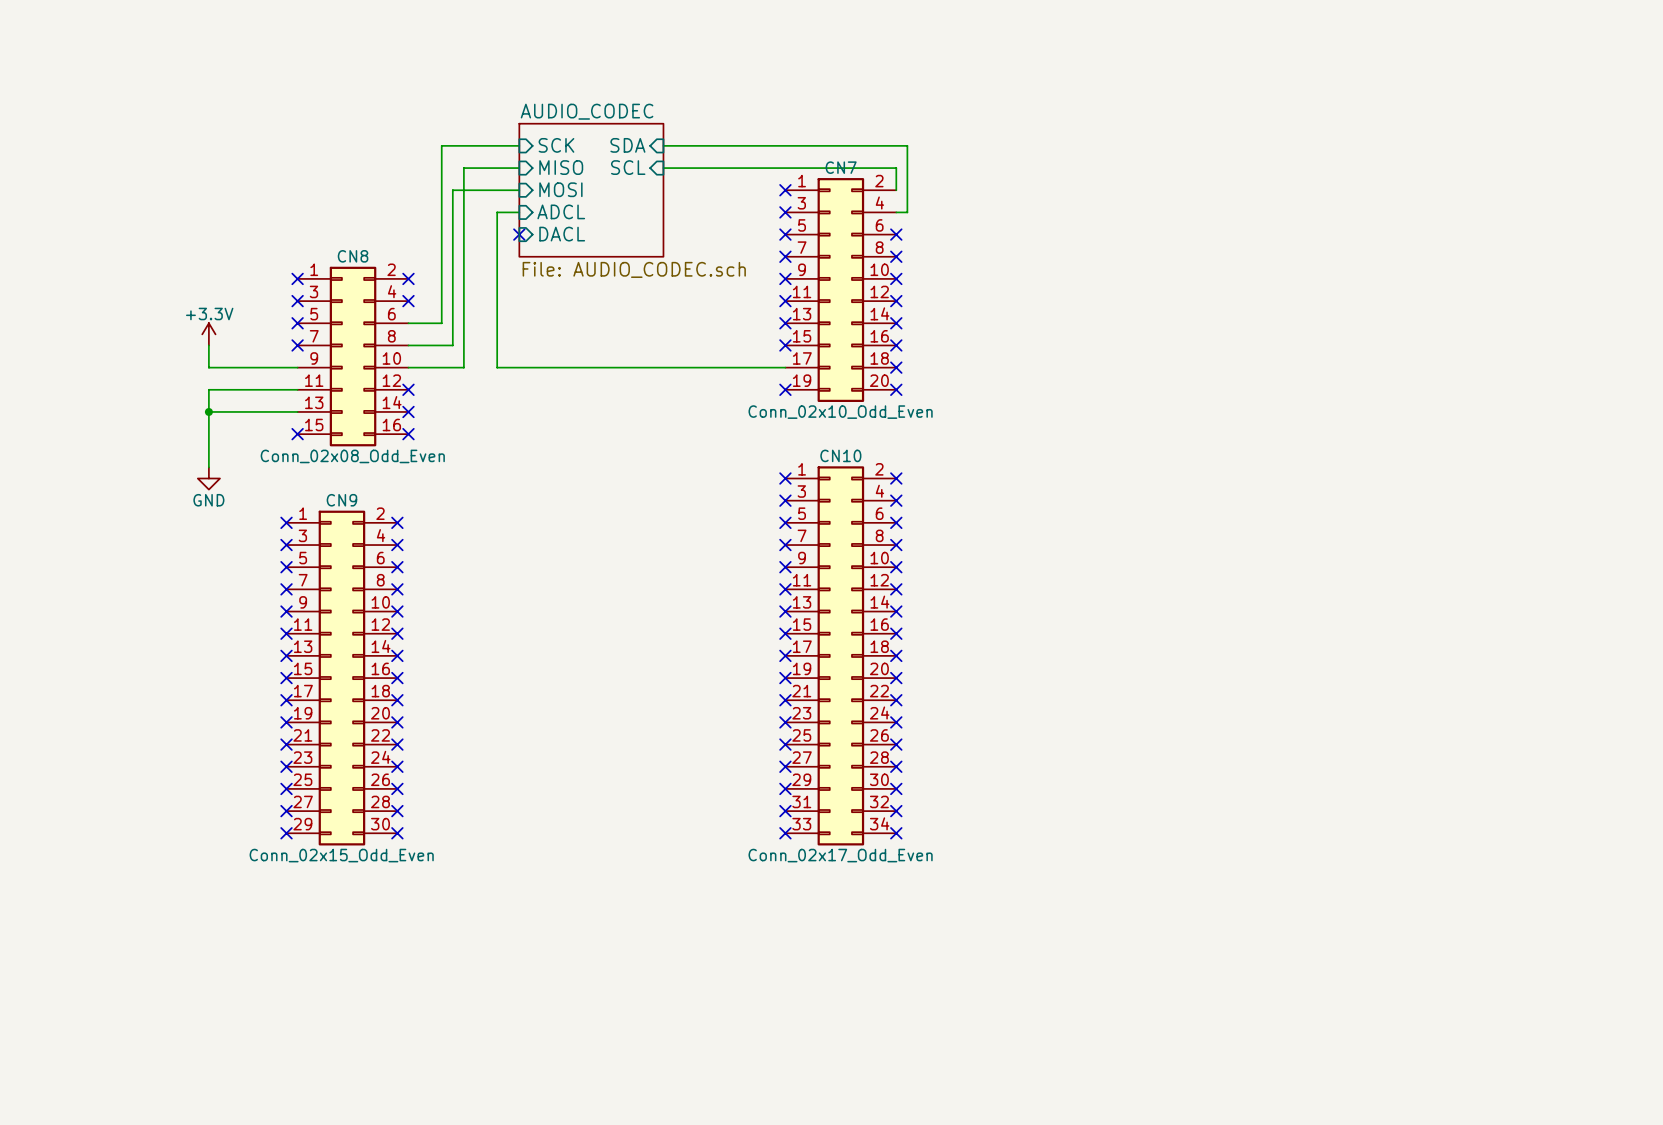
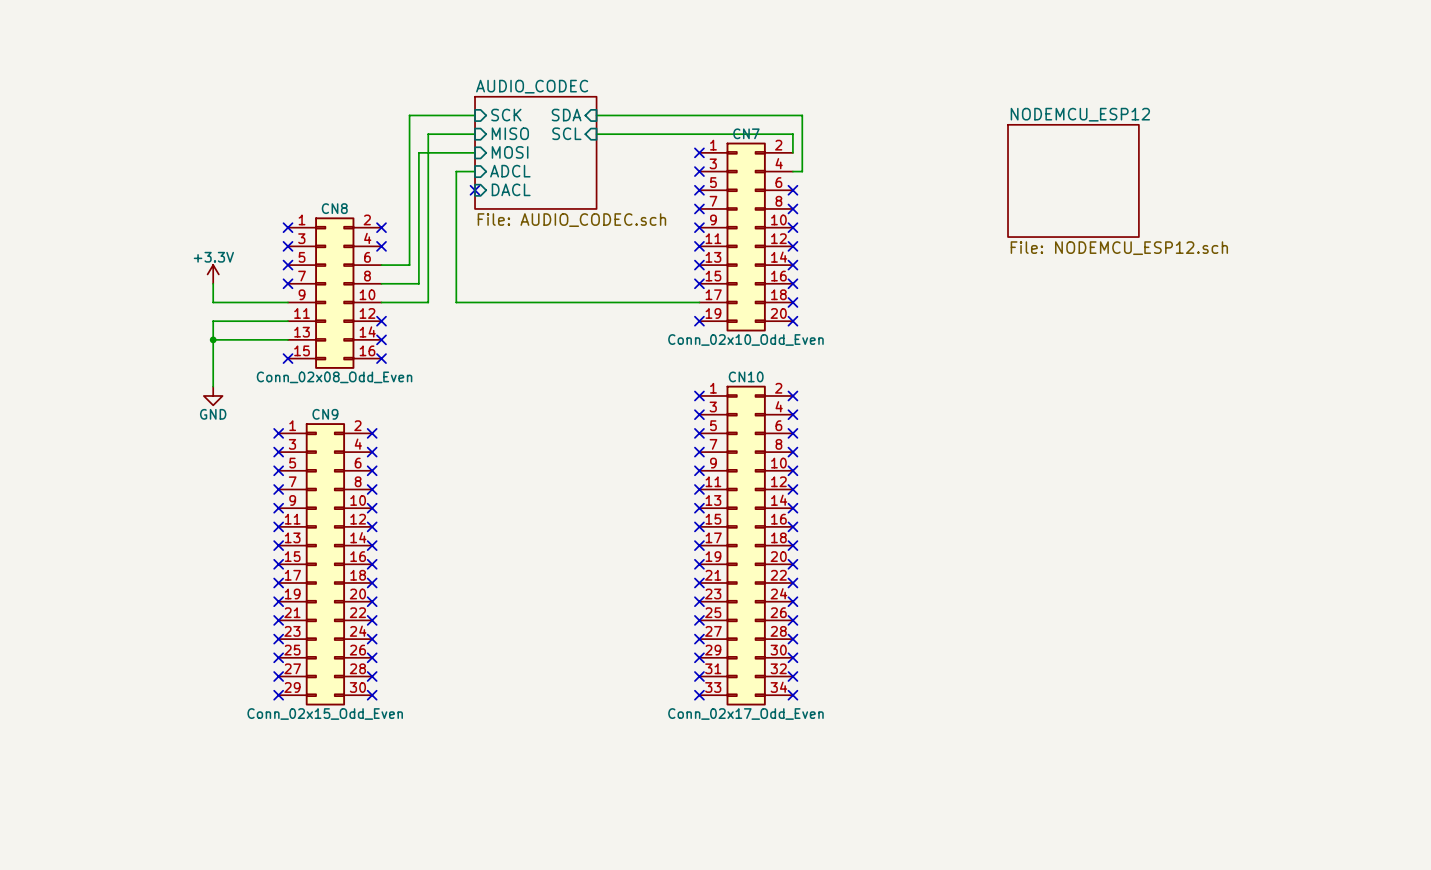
sheet NODEMCU_ESP12: none -> File: NODEMCU_ESP12.sch (1073, 180)

